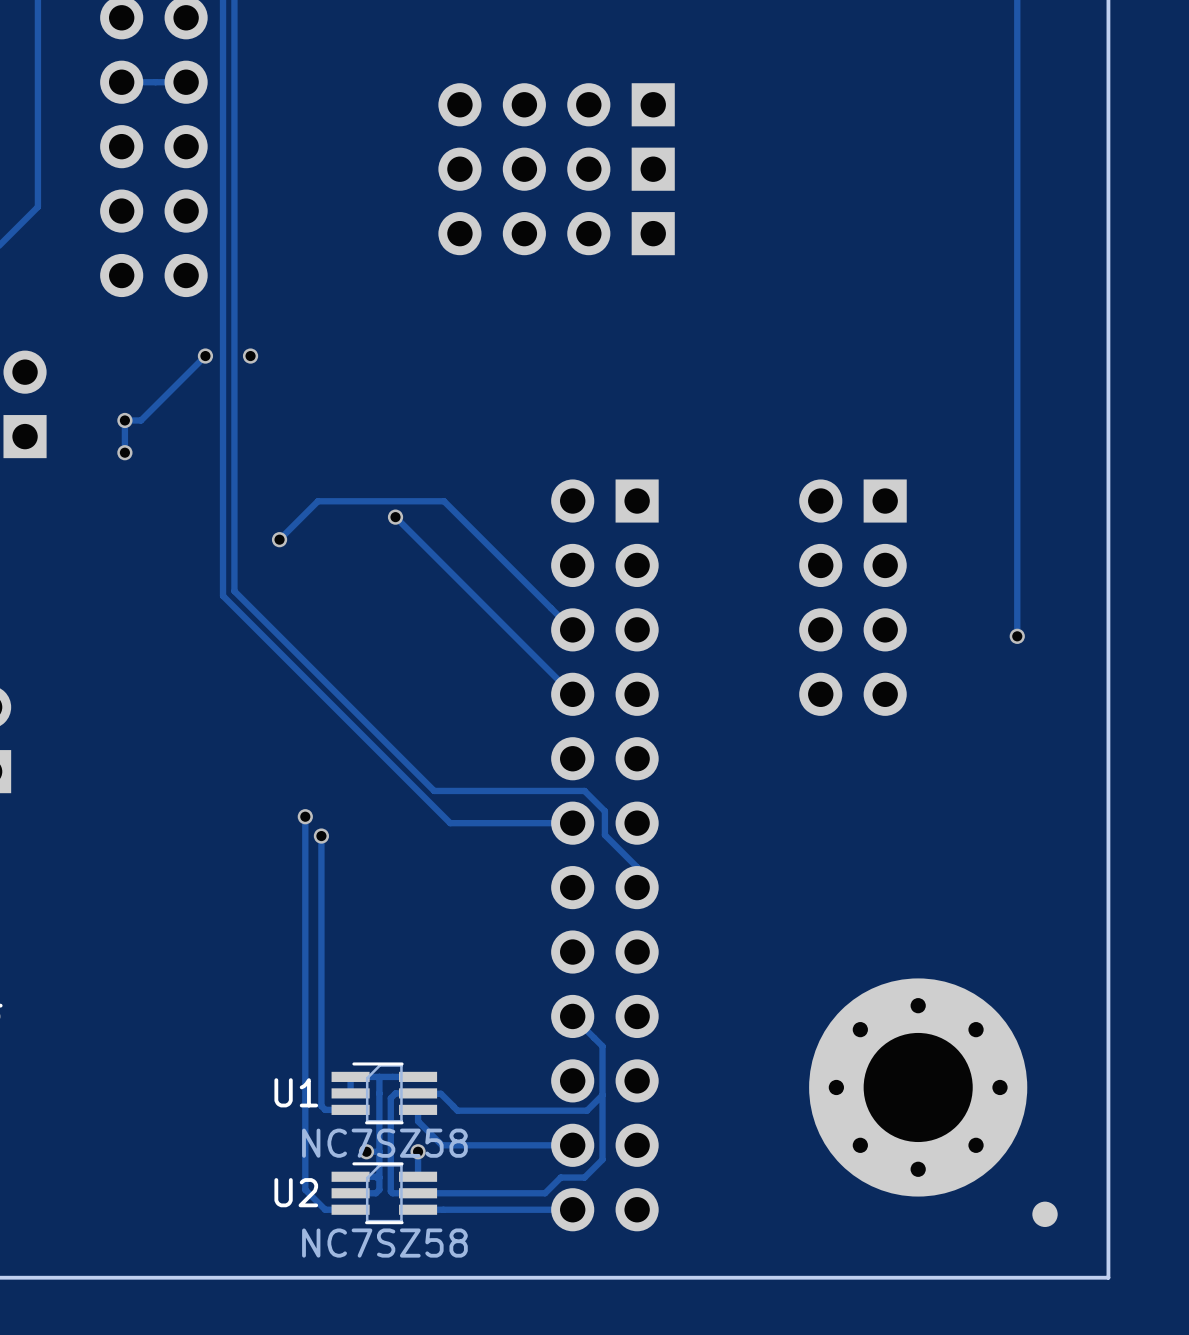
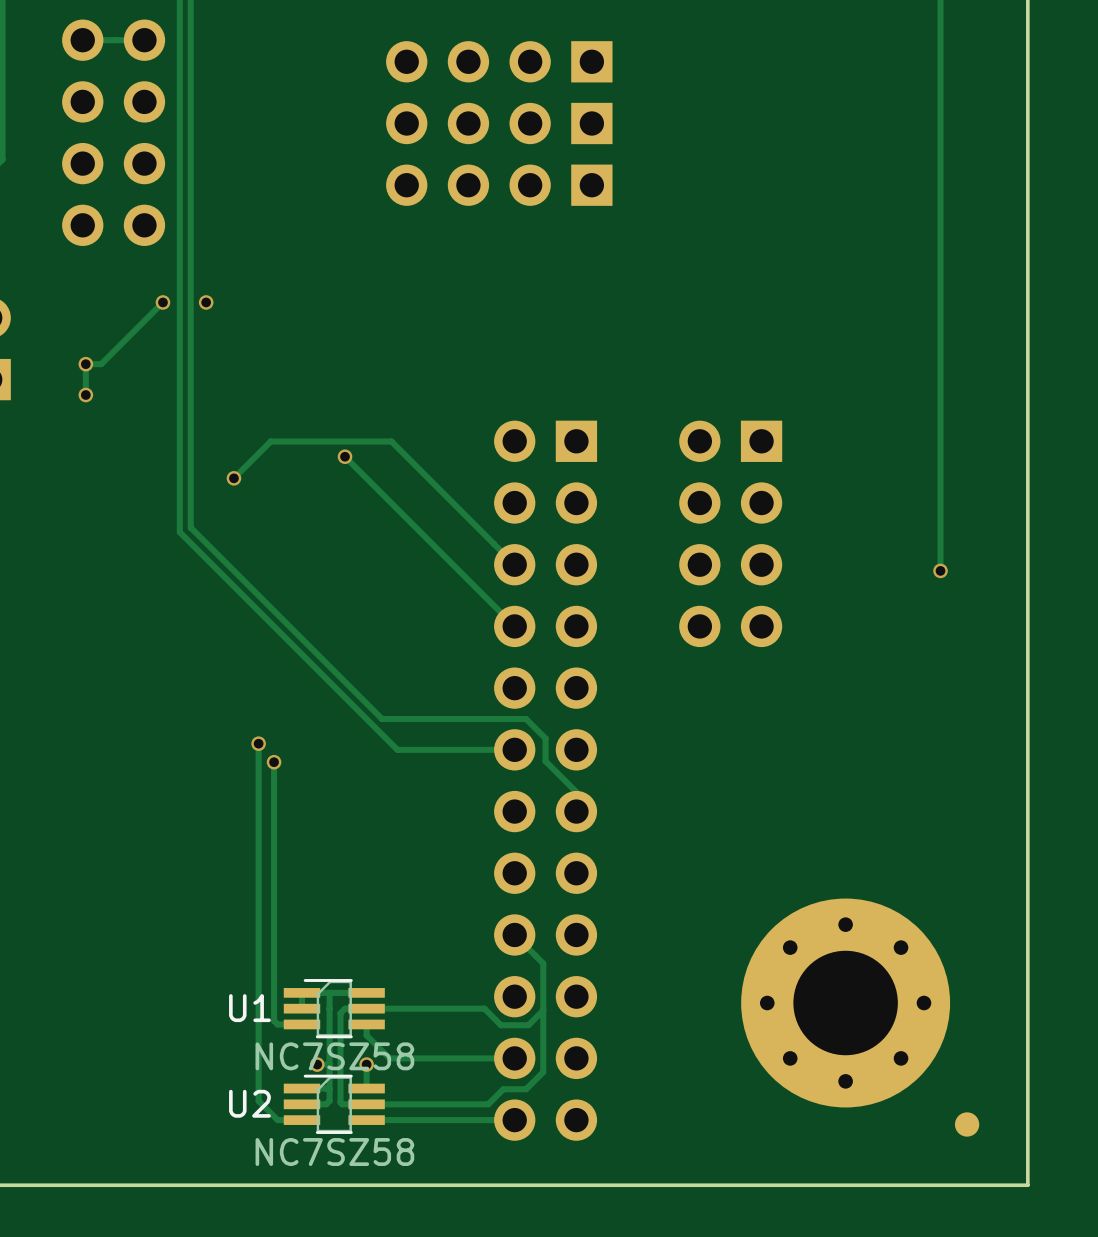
part position: (852, 597) -> (730, 533)
track: (418, 1093) (440, 1093) (453, 1106) -> none
track: (453, 1106) (457, 1110) (558, 1110) -> (366, 1008) (484, 1008) (501, 1025)

